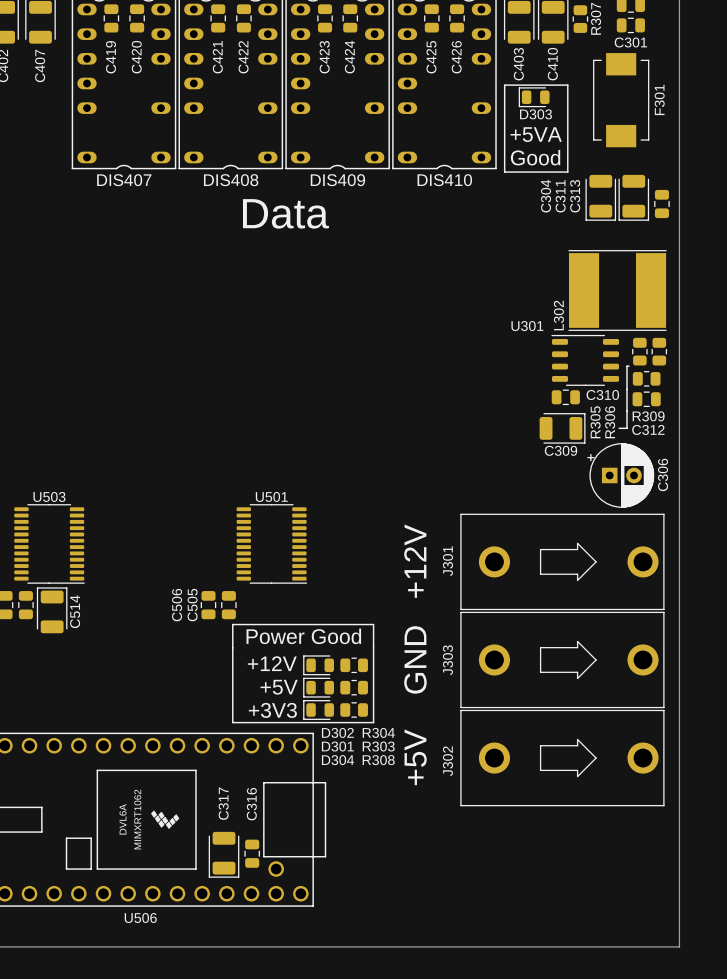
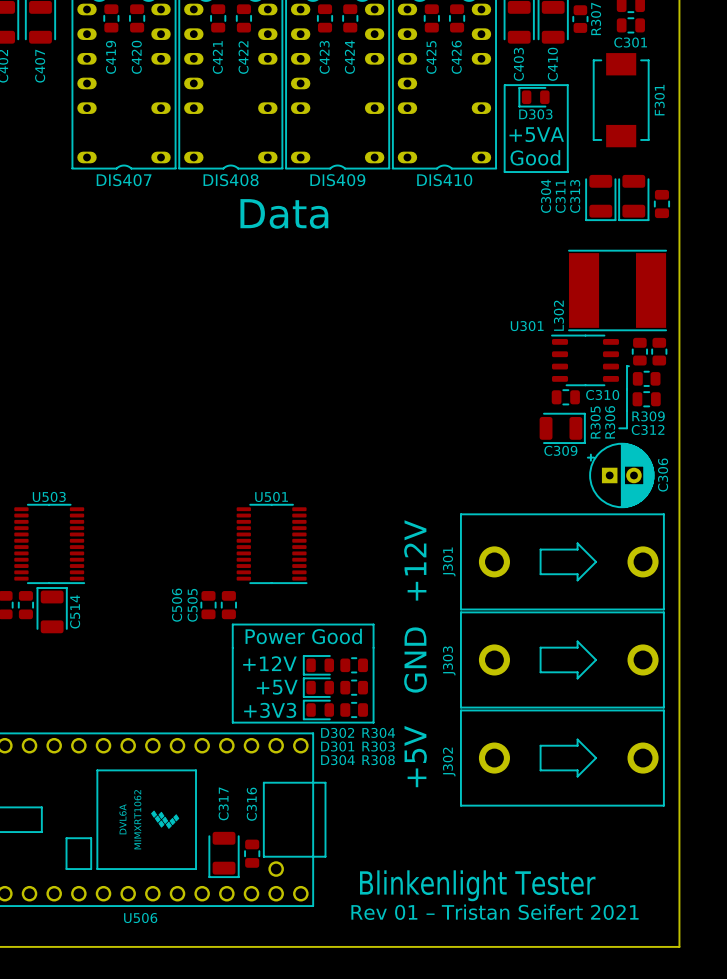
text: none -> Blinkenlight Tester (477, 885)
text: none -> Rev 01 – Tristan Seifert 2021 (495, 912)

